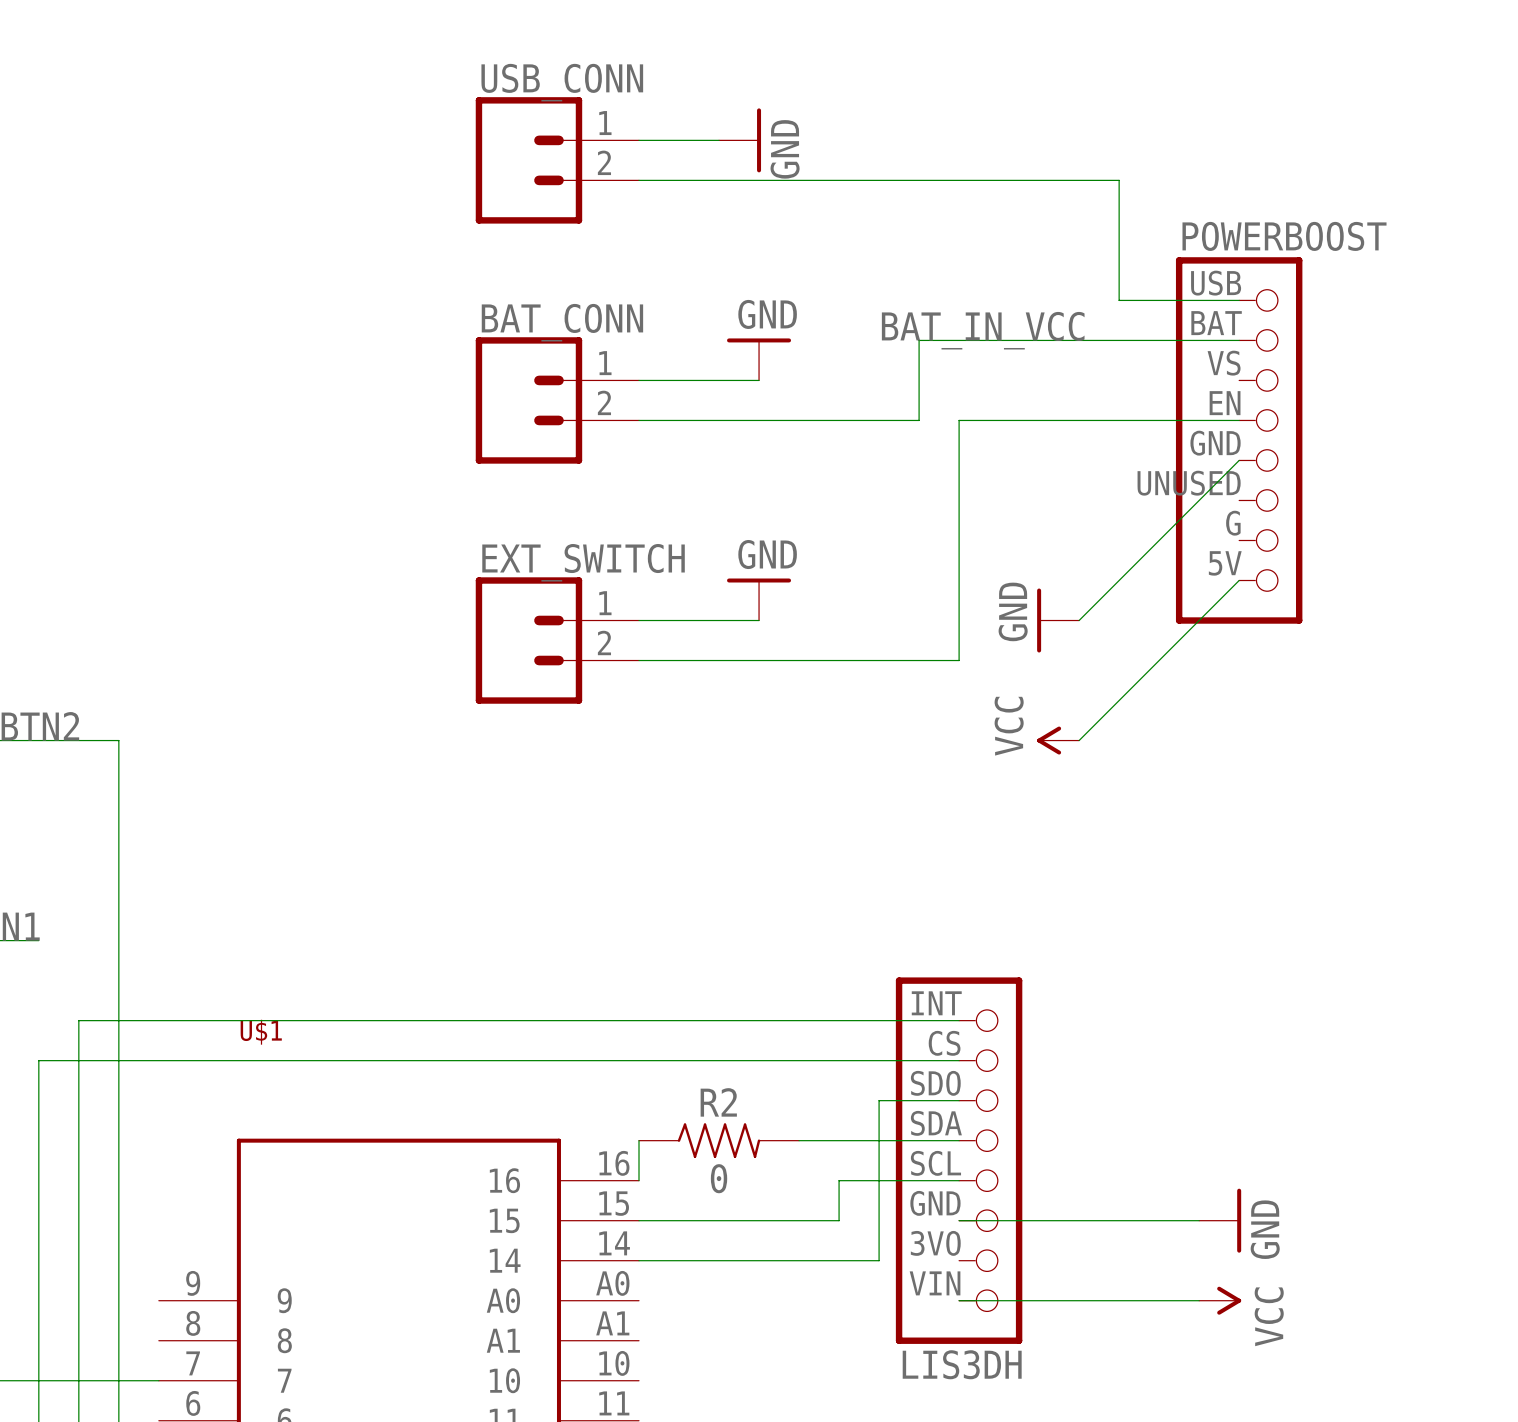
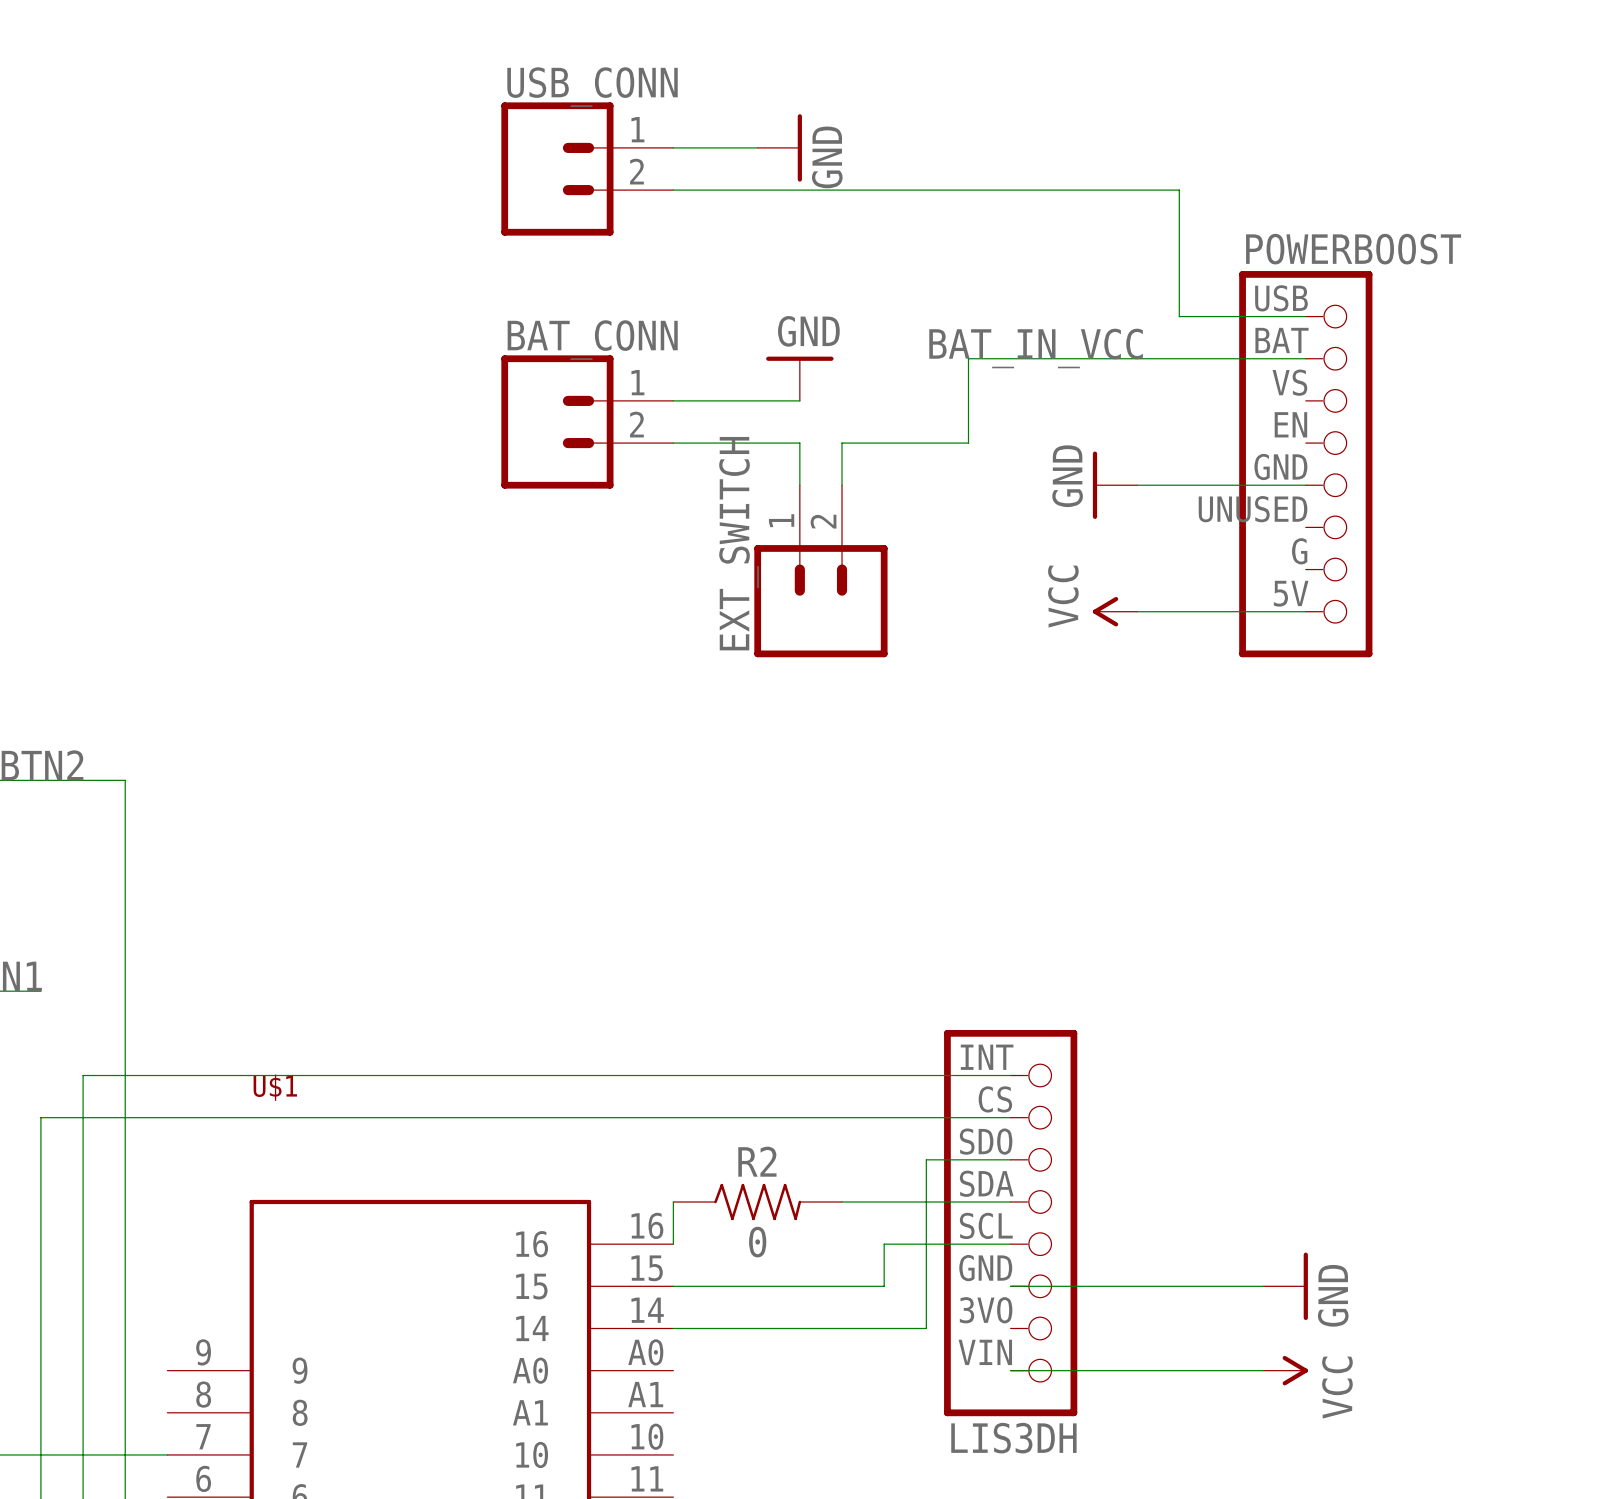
wire: (759, 420) (799, 420) -> (799, 443) (799, 485)
wire: none -> (842, 443) (842, 485)
wire: (1239, 420) (959, 420) (959, 660) (639, 660) -> none
wire: (1239, 460) (1079, 620) -> (1305, 485) (1137, 485)
wire: (1239, 580) (1079, 740) -> (1305, 611) (1137, 611)
power symbol: GND (759, 599) -> none
wire: (639, 620) (759, 620) -> none
power symbol position: GND (1058, 620) -> GND (1115, 485)
EXT_SWITCH rotation: 0° (528, 640) -> 90° counterclockwise (820, 601)
EXT_SWITCH position: (557, 640) -> (820, 571)
power symbol position: VCC (1058, 740) -> VCC (1115, 611)

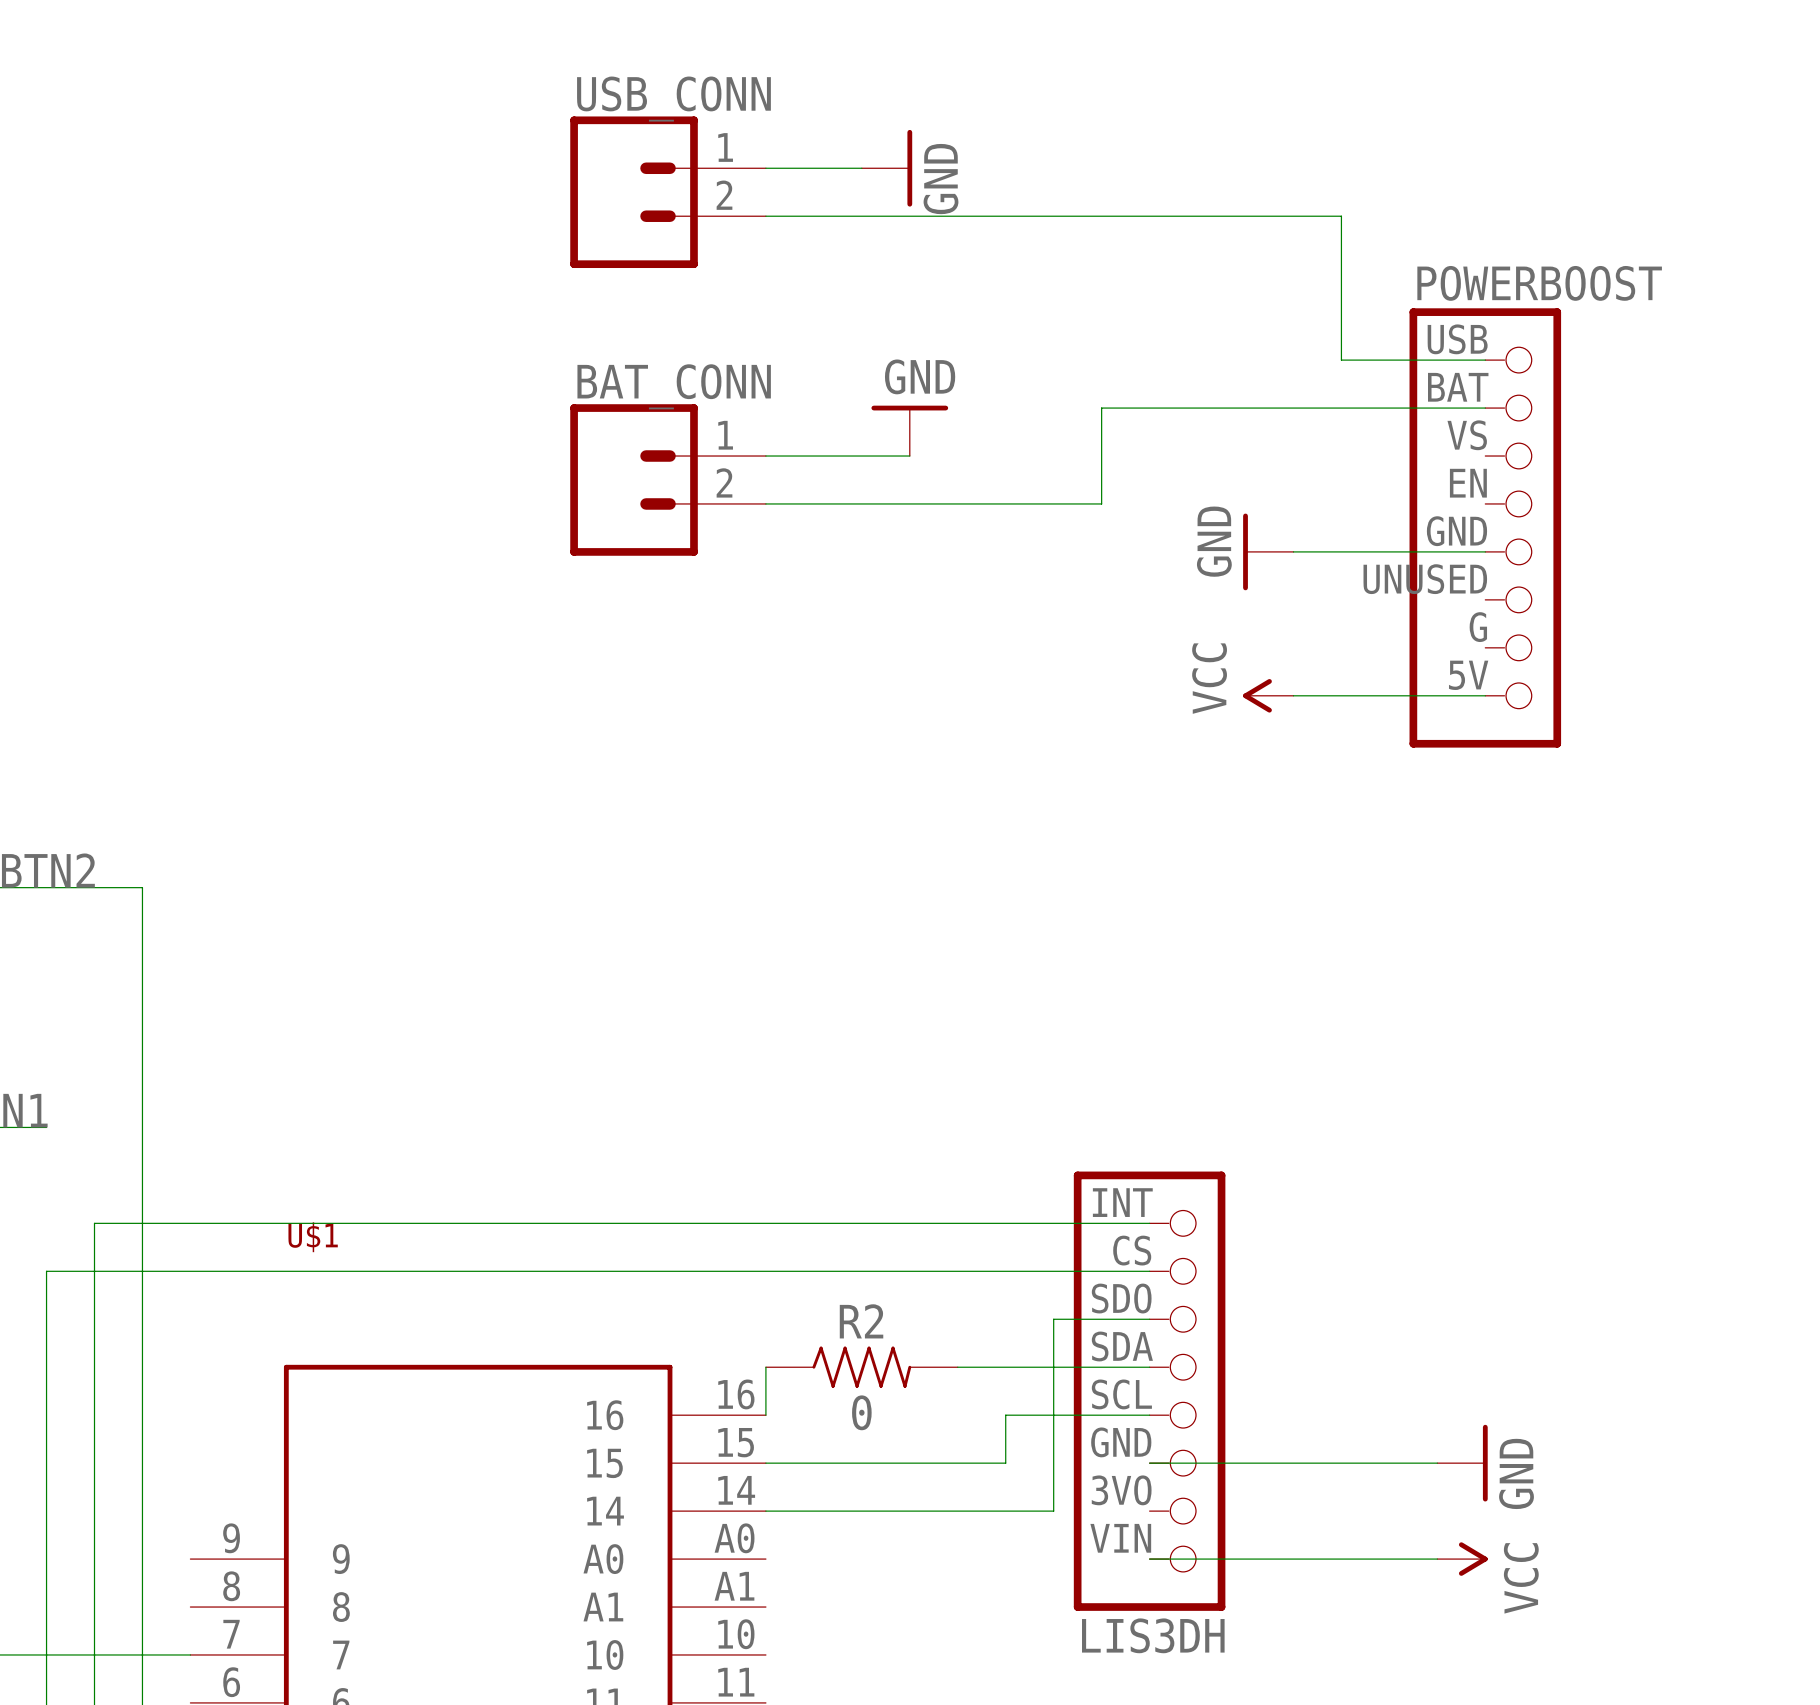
label: BAT_IN_VCC (1036, 348) -> none
wire: (799, 443) (799, 485) -> (909, 503) (957, 503)
wire: (842, 443) (842, 485) -> none
EXT_SWITCH: (820, 571) -> none

